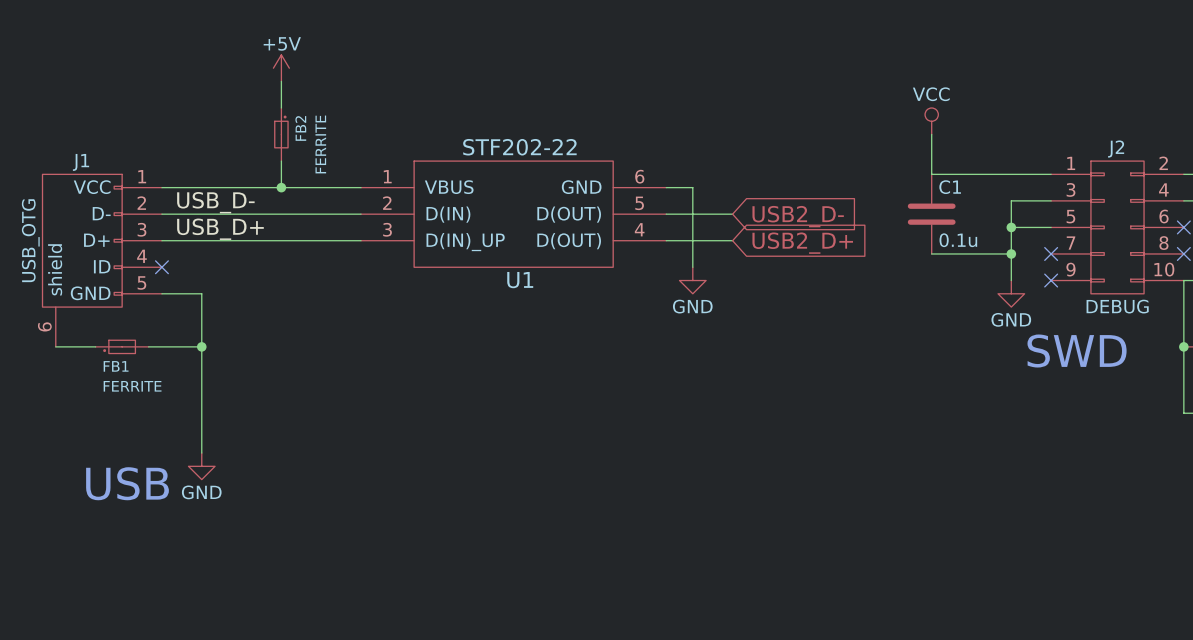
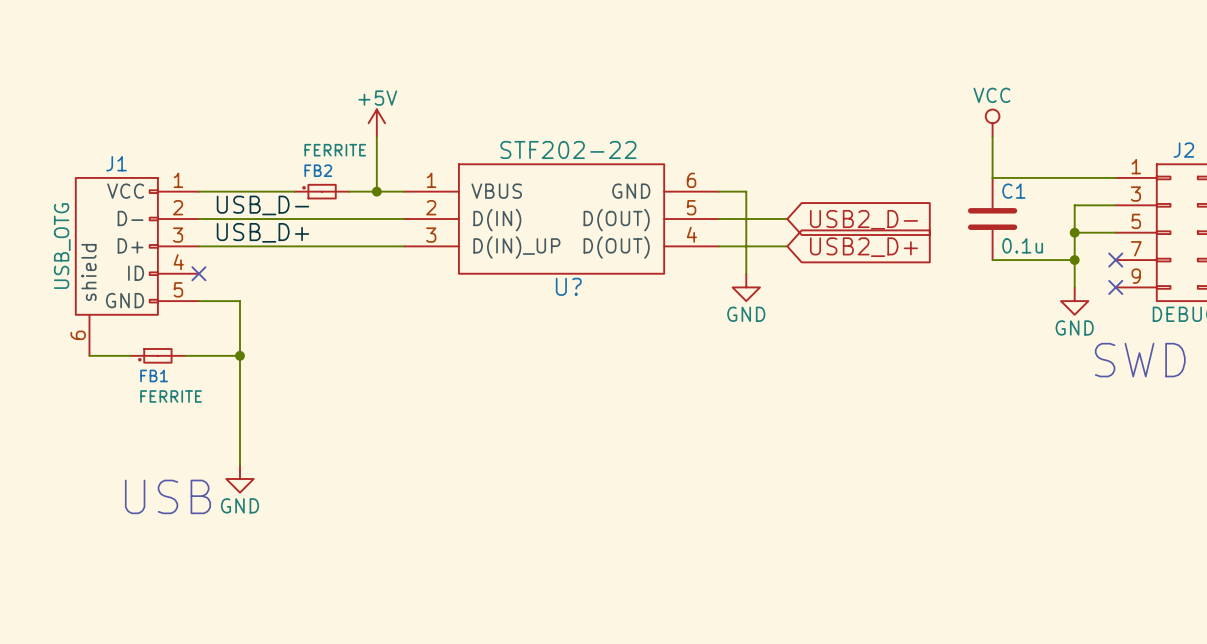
power symbol position: +5V (281, 68) -> +5V (376, 123)
wire: (281, 81) (281, 108) -> none
FB2 rotation: 0° (281, 132) -> 90° counterclockwise (319, 191)
FB2 position: (281, 134) -> (322, 191)
wire: none -> (376, 136) (376, 191)
wire: (281, 161) (281, 187) -> none
junction position: (281, 187) -> (376, 191)
U1 name: U1 (520, 280) -> U? (568, 286)

